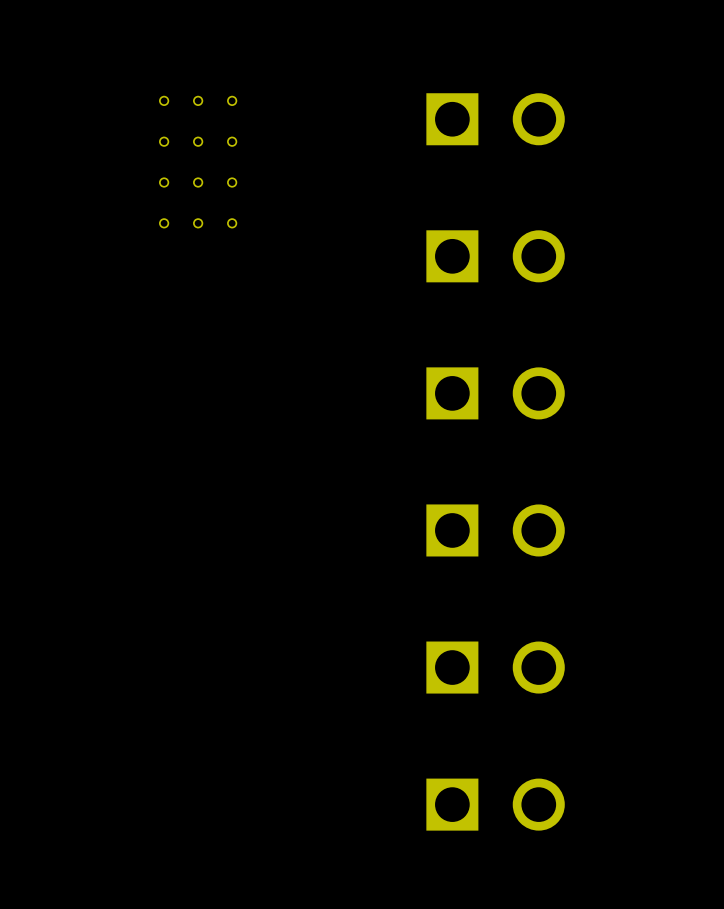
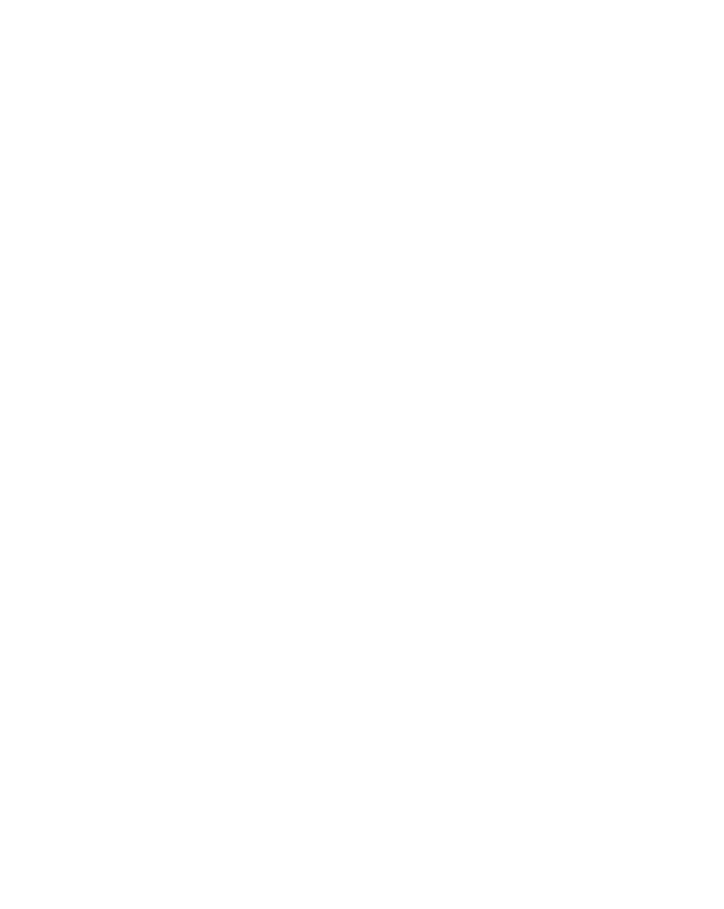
part: (495, 119) -> none
part: (198, 162) -> none
part: (495, 256) -> none
part: (495, 393) -> none
part: (495, 530) -> none
part: (495, 667) -> none
part: (495, 804) -> none

